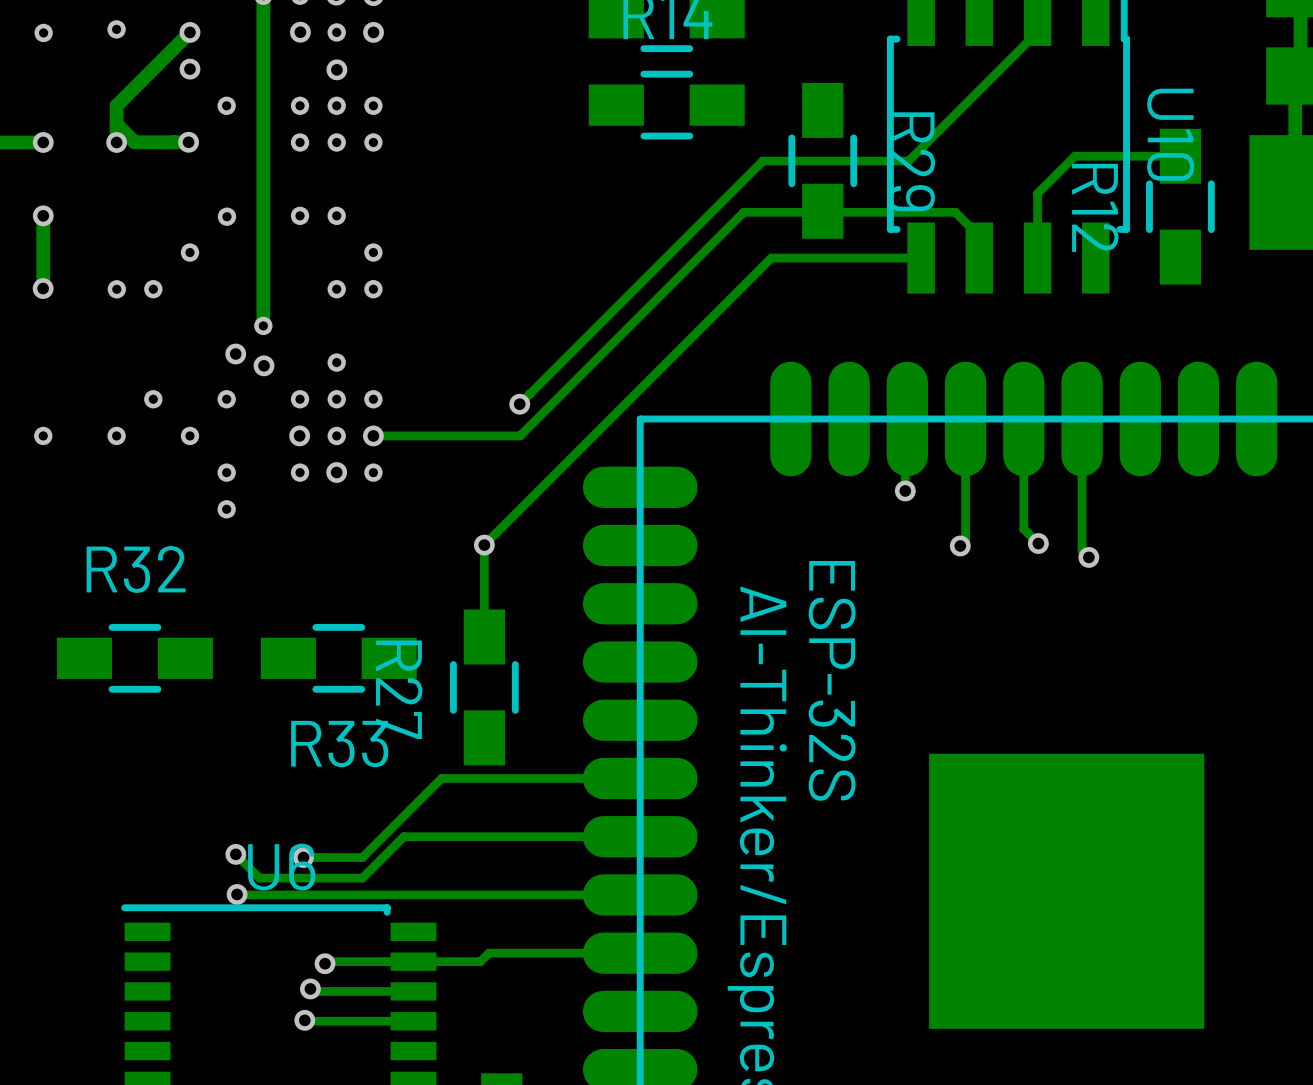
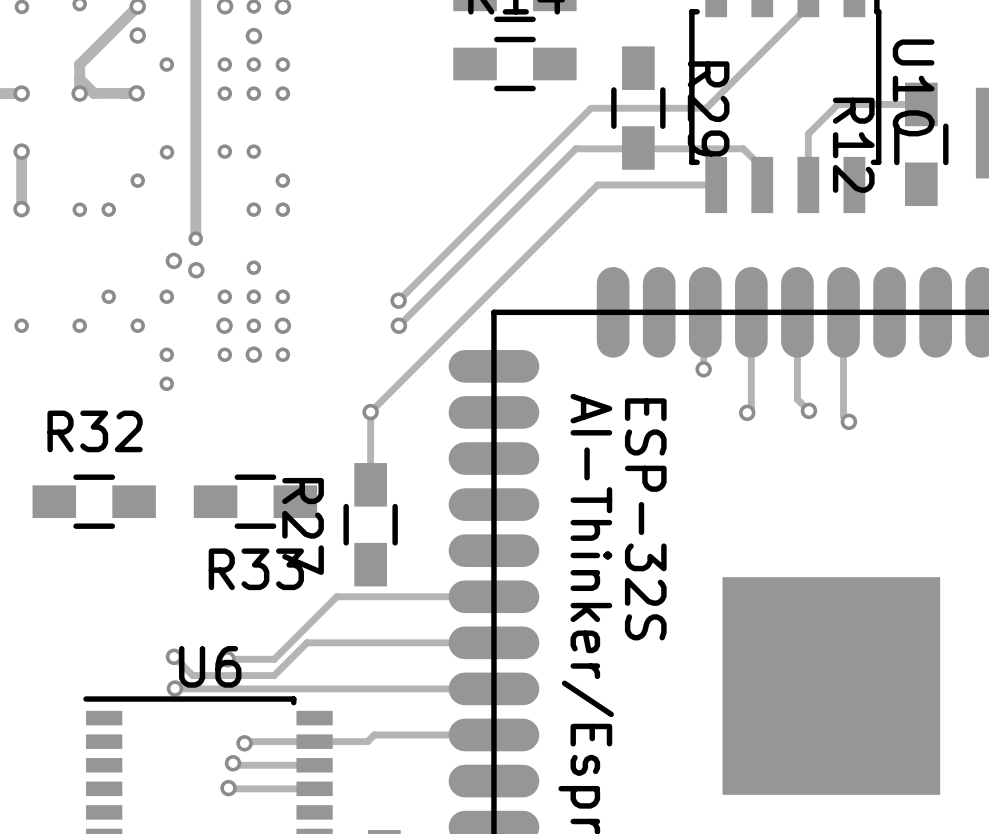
track: (520, 435) (373, 435) -> none
via: none -> (398, 325)

